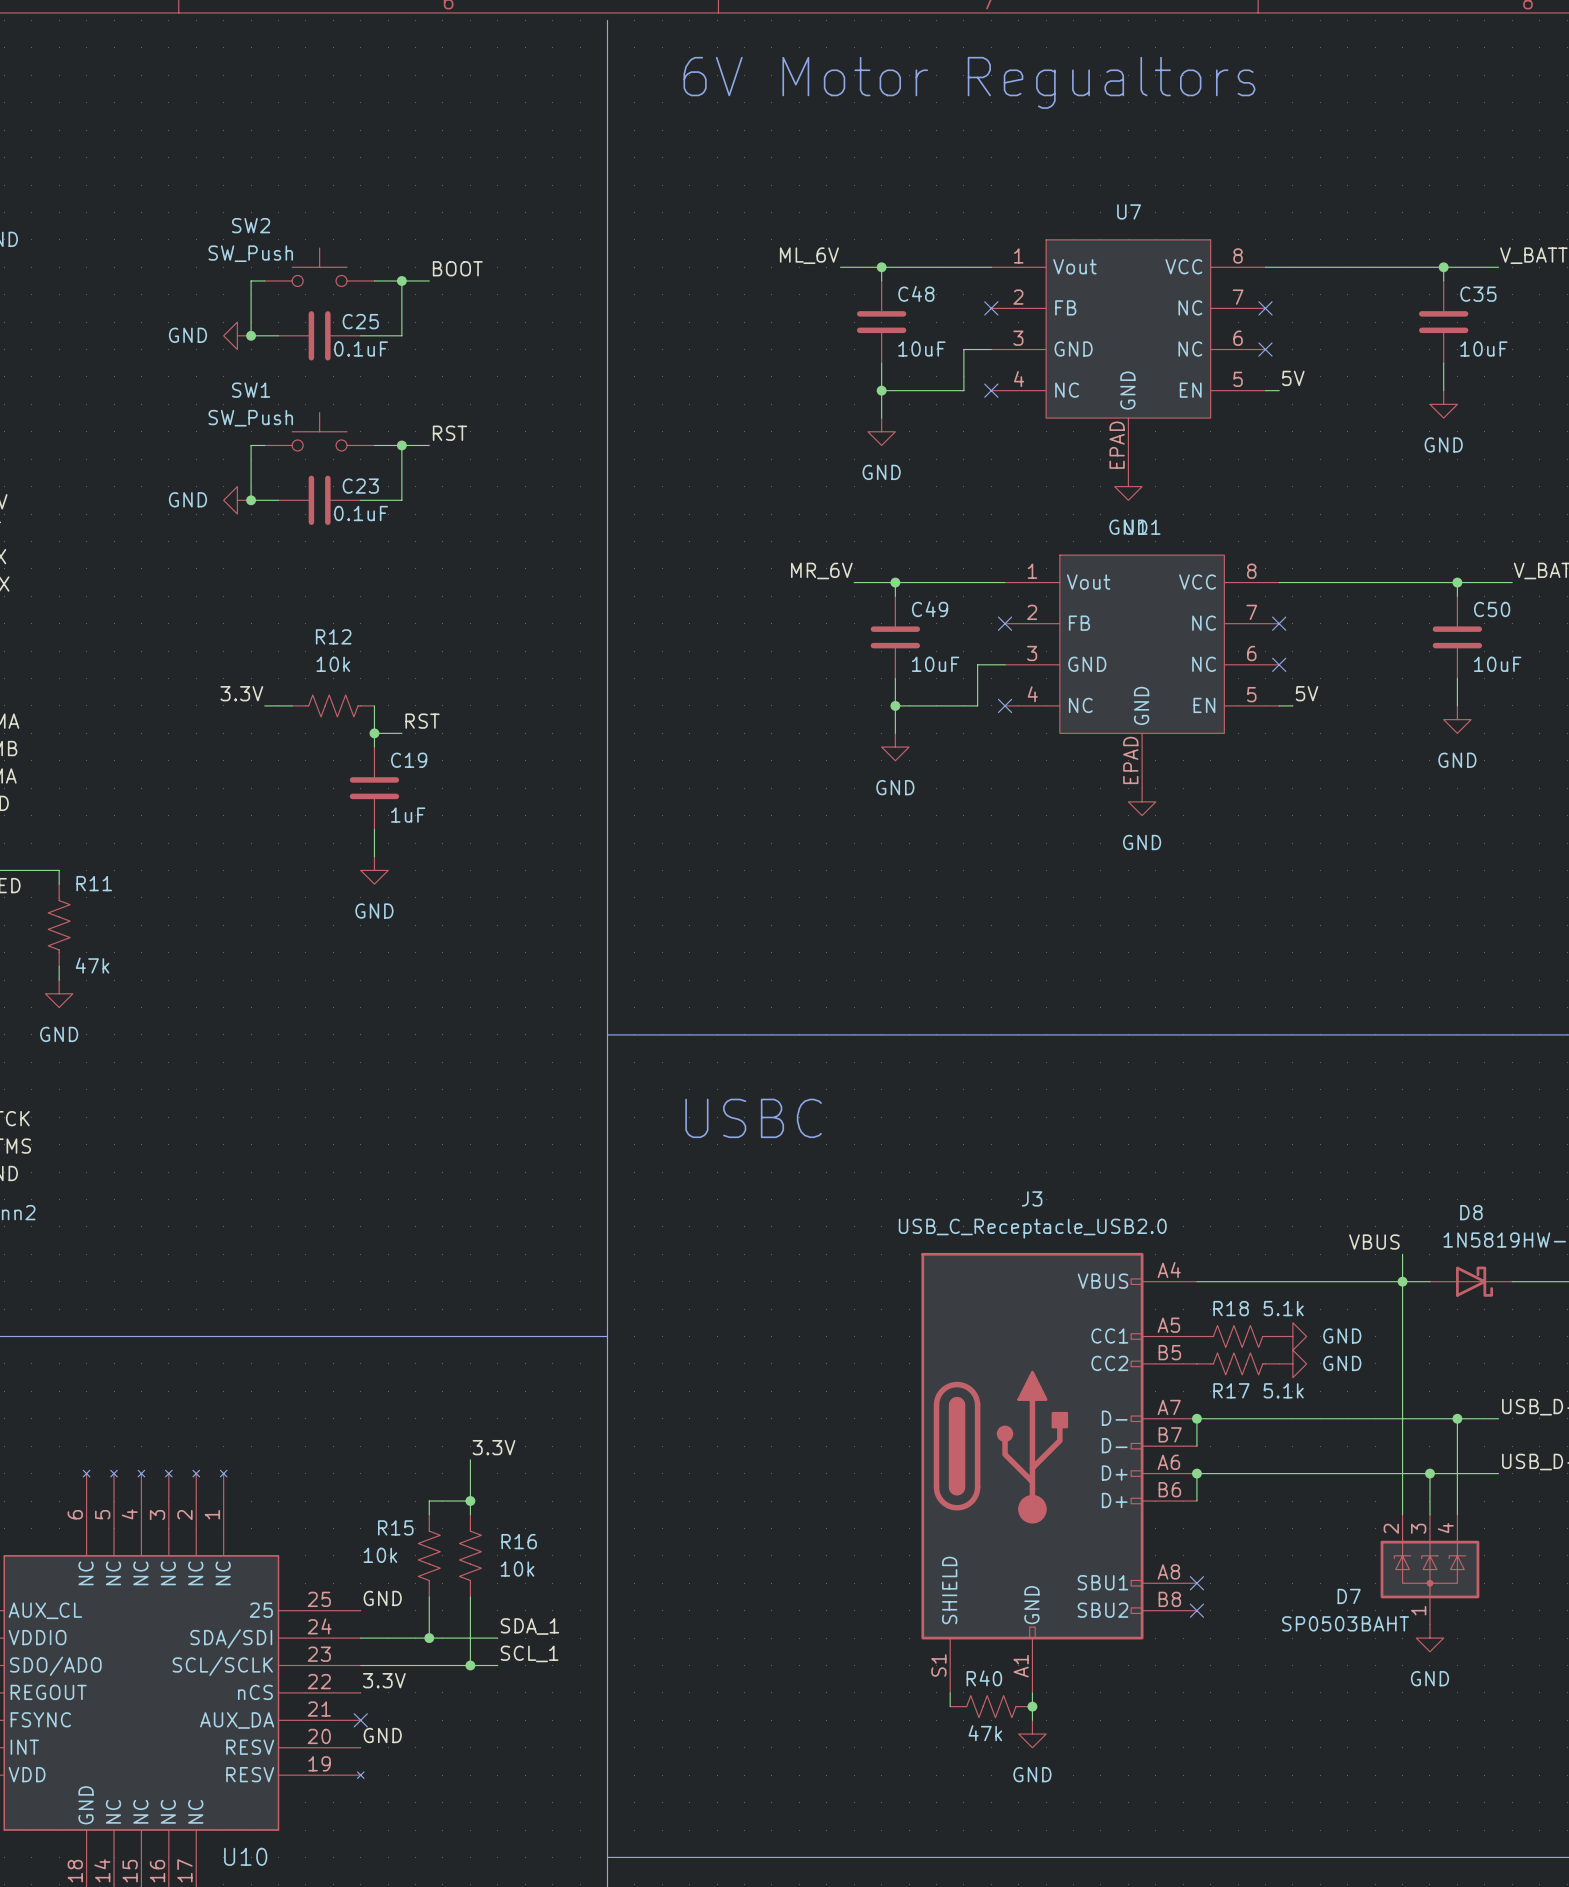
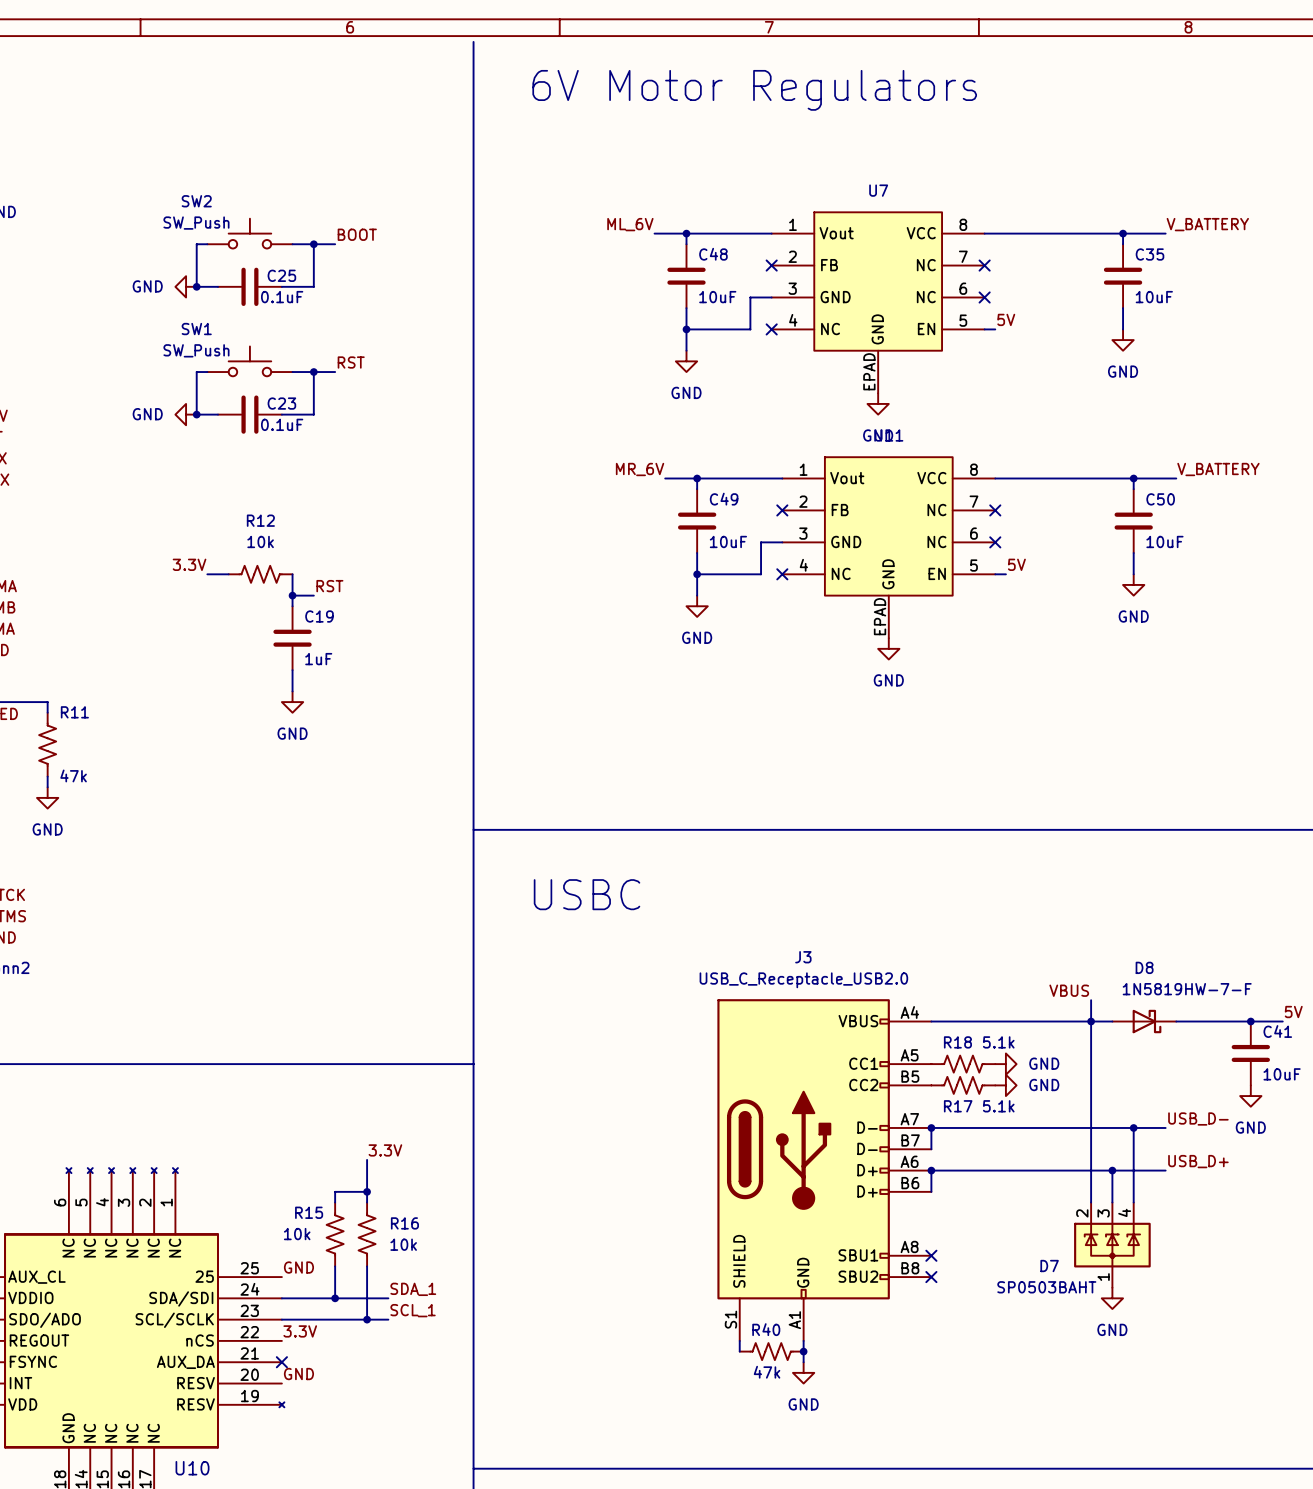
text: 6V Motor Regualtors (969, 82) -> 6V Motor Regulators (754, 90)

